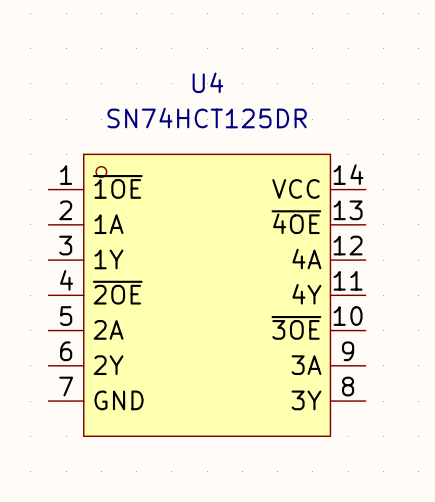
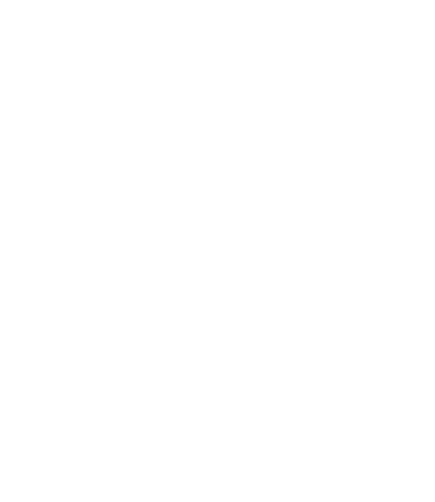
U4: SN74HCT125DR (207, 295) -> none

